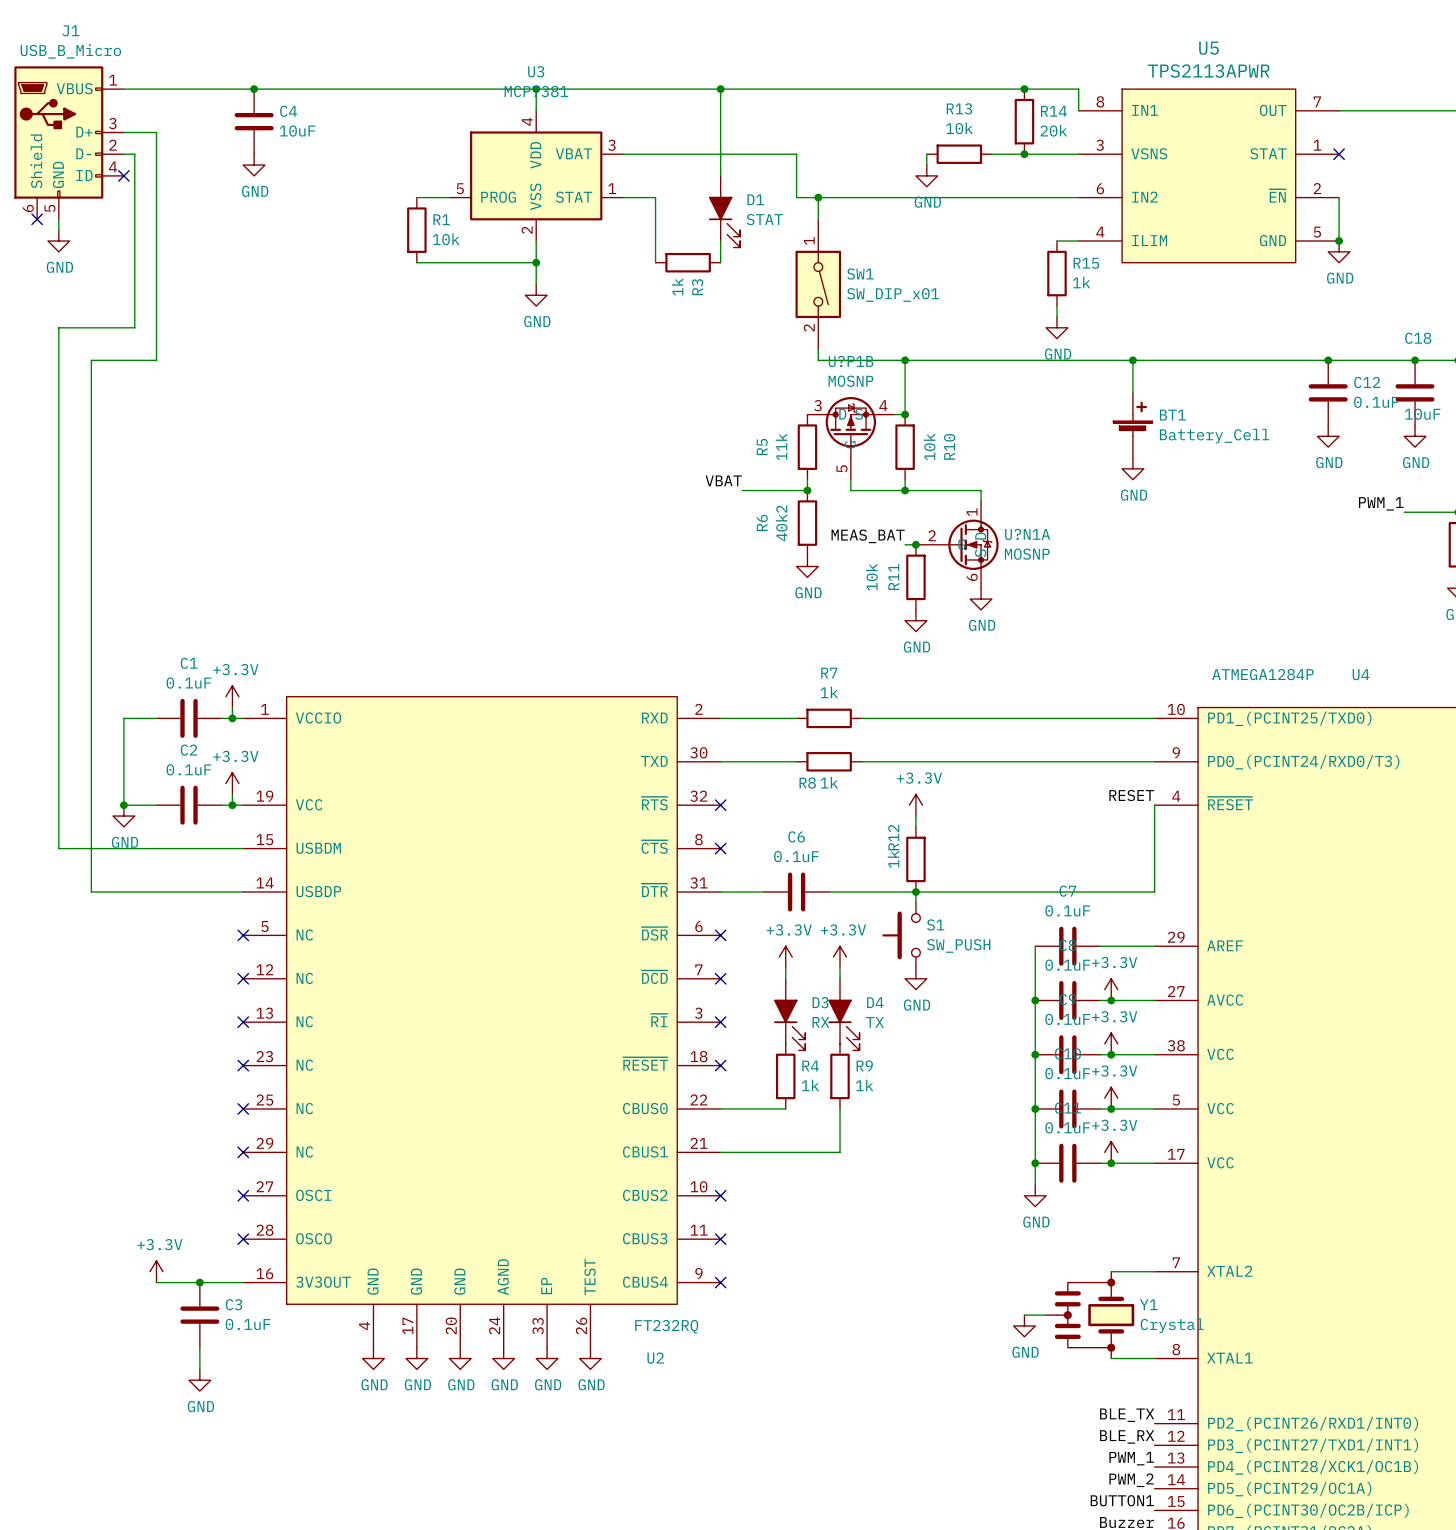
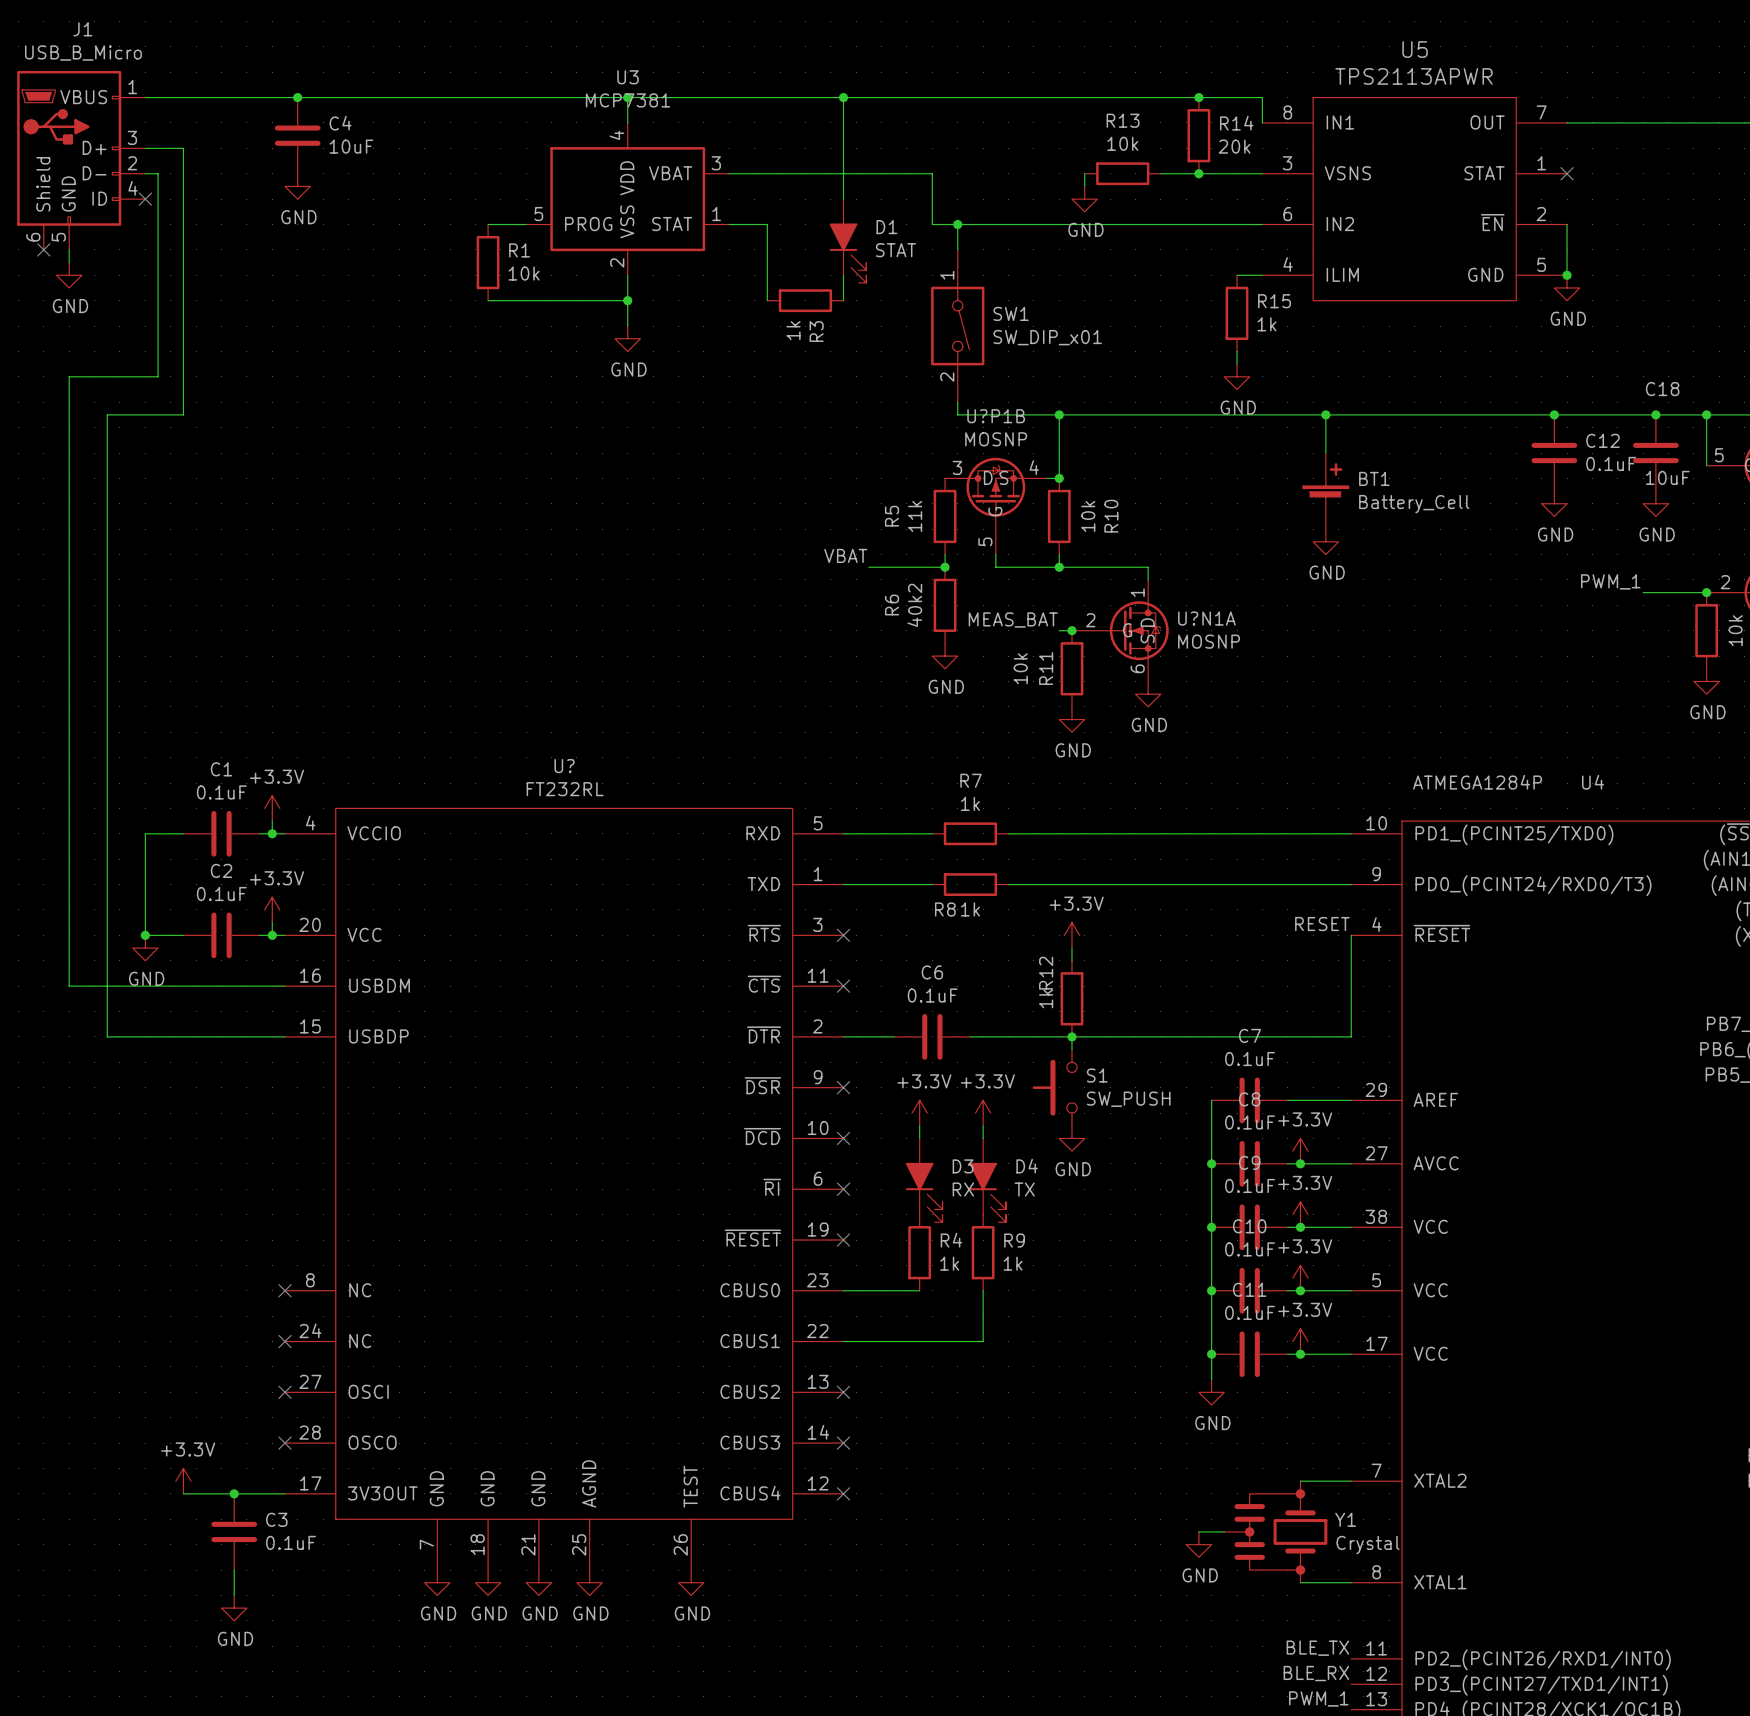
no-connect mark: (243, 935) -> none
no-connect mark: (243, 978) -> none
no-connect mark: (243, 1022) -> none
U2: FT232RQ (481, 1022) -> none
U?: none -> FT232RL (564, 1189)
no-connect mark: (243, 1065) -> none
power symbol: GND (547, 1358) -> none

